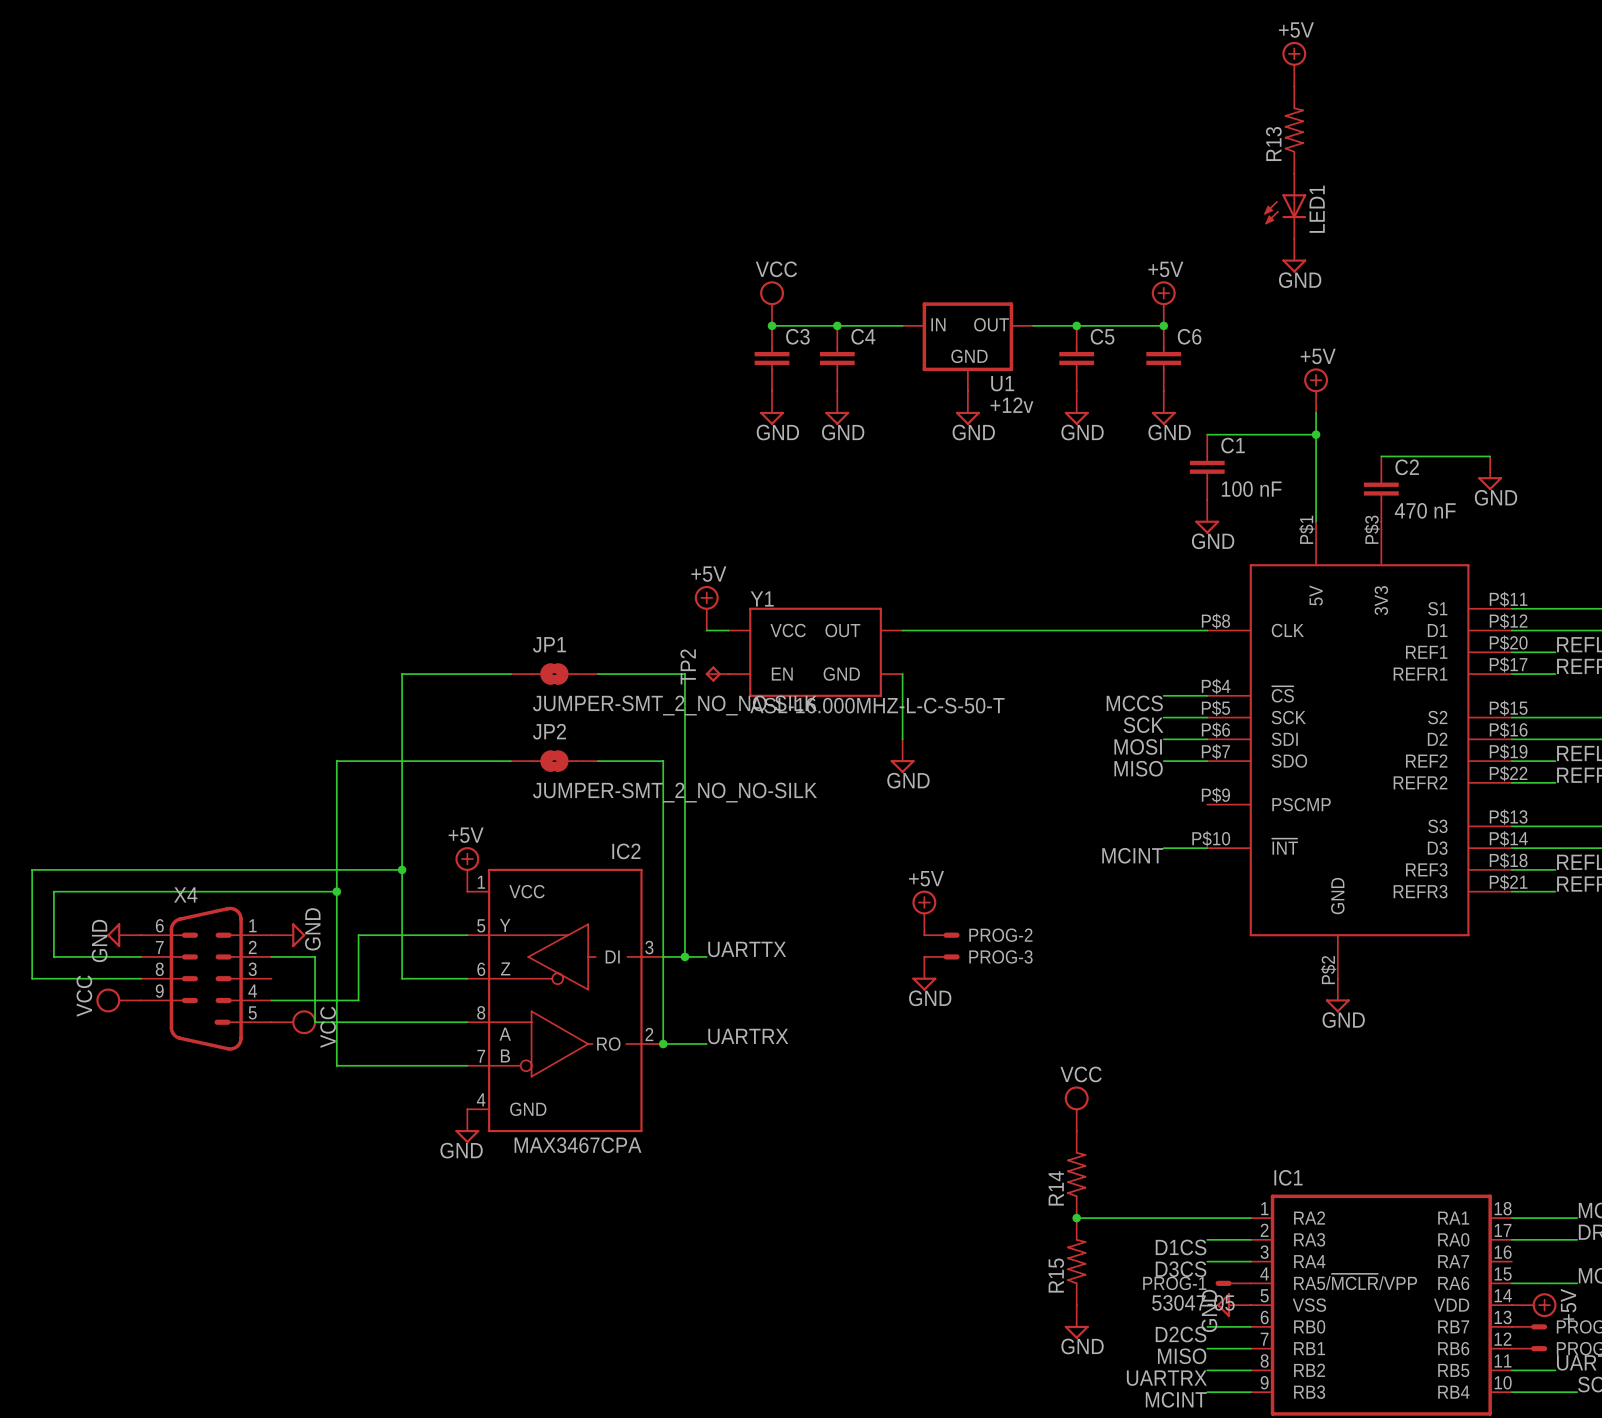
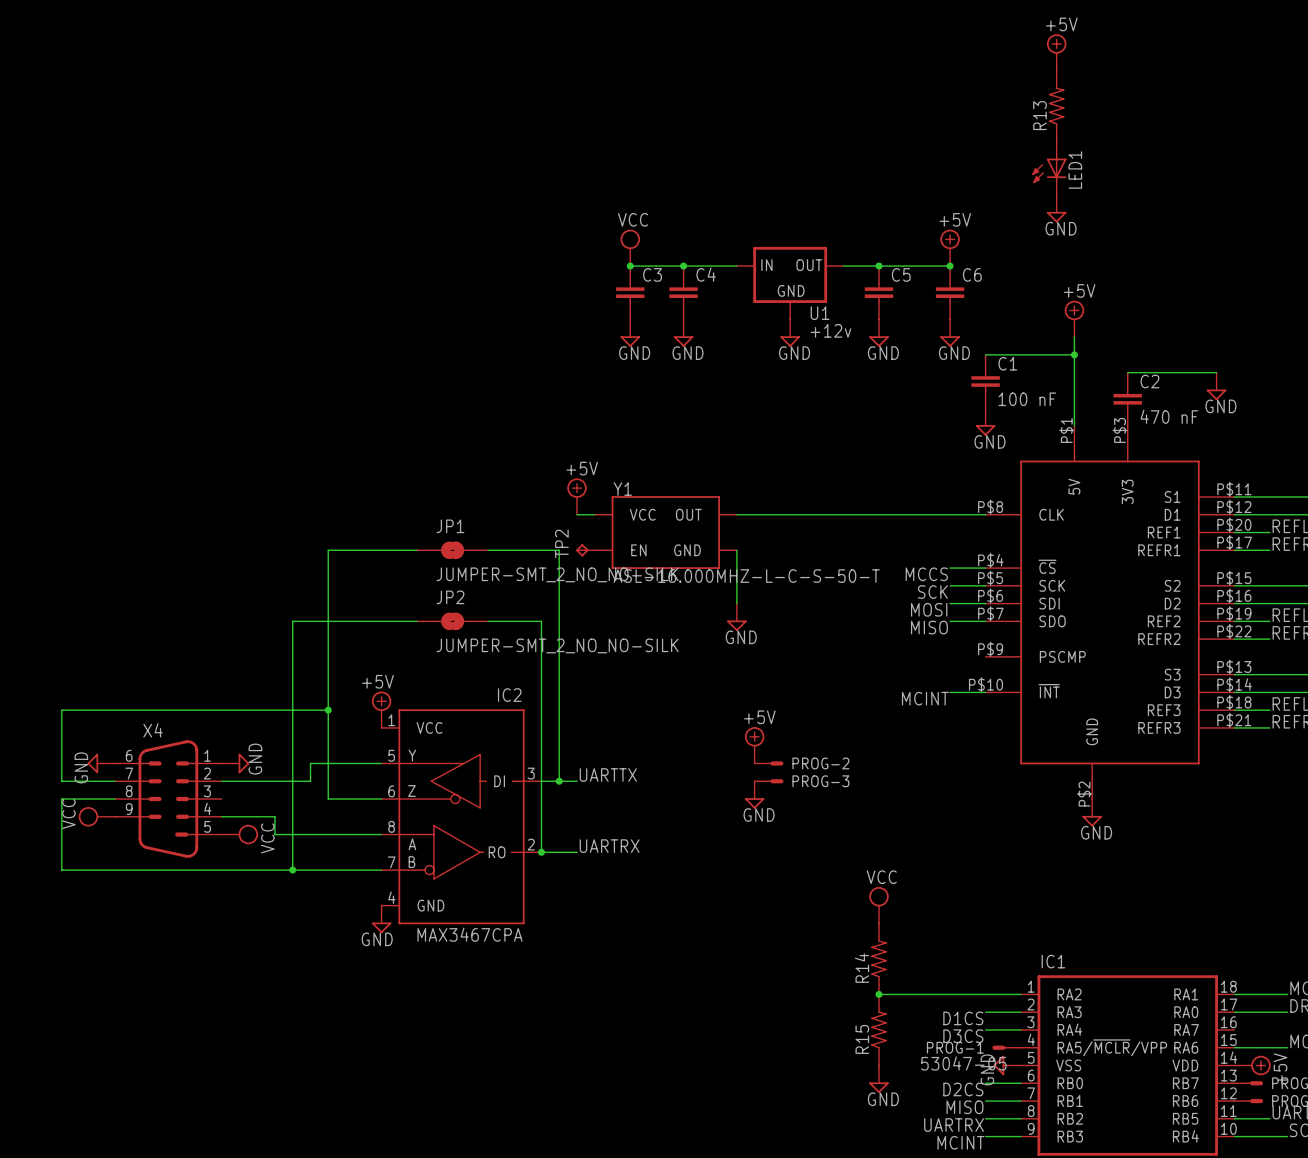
wire: (358, 761) (336, 761) (336, 1000) (358, 1000) -> (292, 621) (292, 763)
wire: (75, 869) (32, 869) (32, 978) (75, 978) -> (61, 710) (61, 781)
wire: (336, 891) (53, 891) (53, 956) (75, 956) -> none
junction: (336, 891) -> none
wire: (358, 935) (380, 935) -> (257, 781) (310, 781) (310, 763)
wire: (315, 956) (315, 1022) (336, 1022) (336, 1065) -> (61, 799) (61, 870) (274, 870)
wire: none -> (292, 816) (292, 870)
junction: none -> (292, 870)

